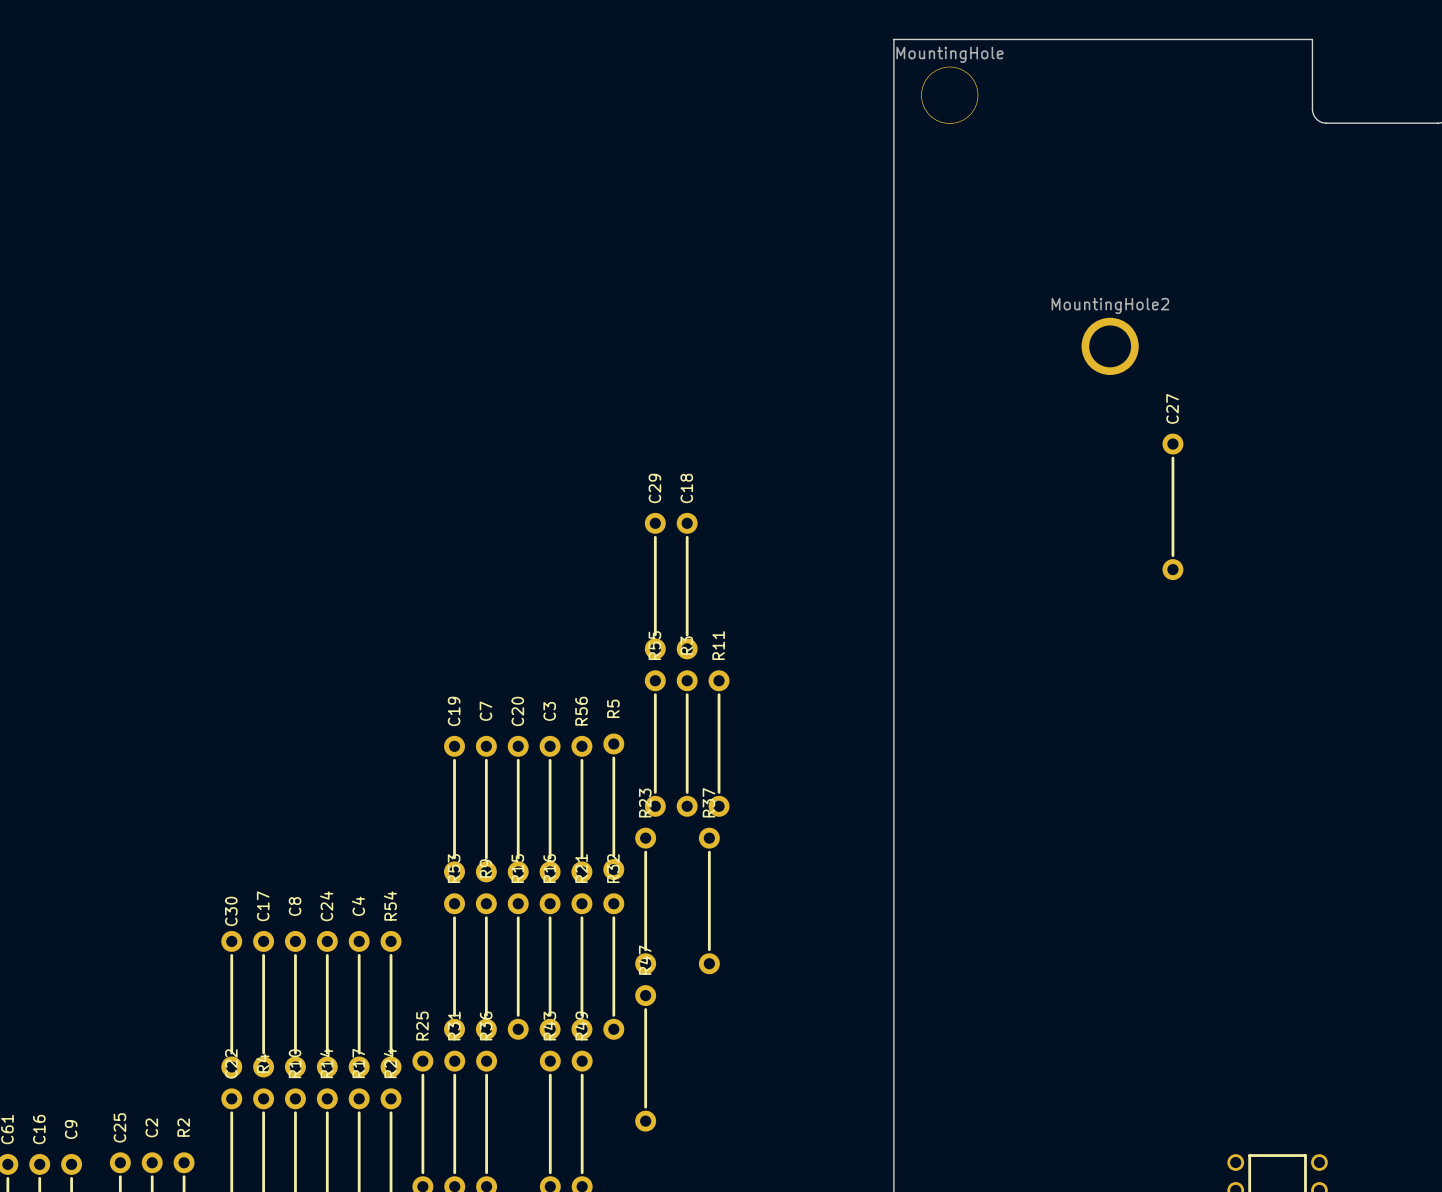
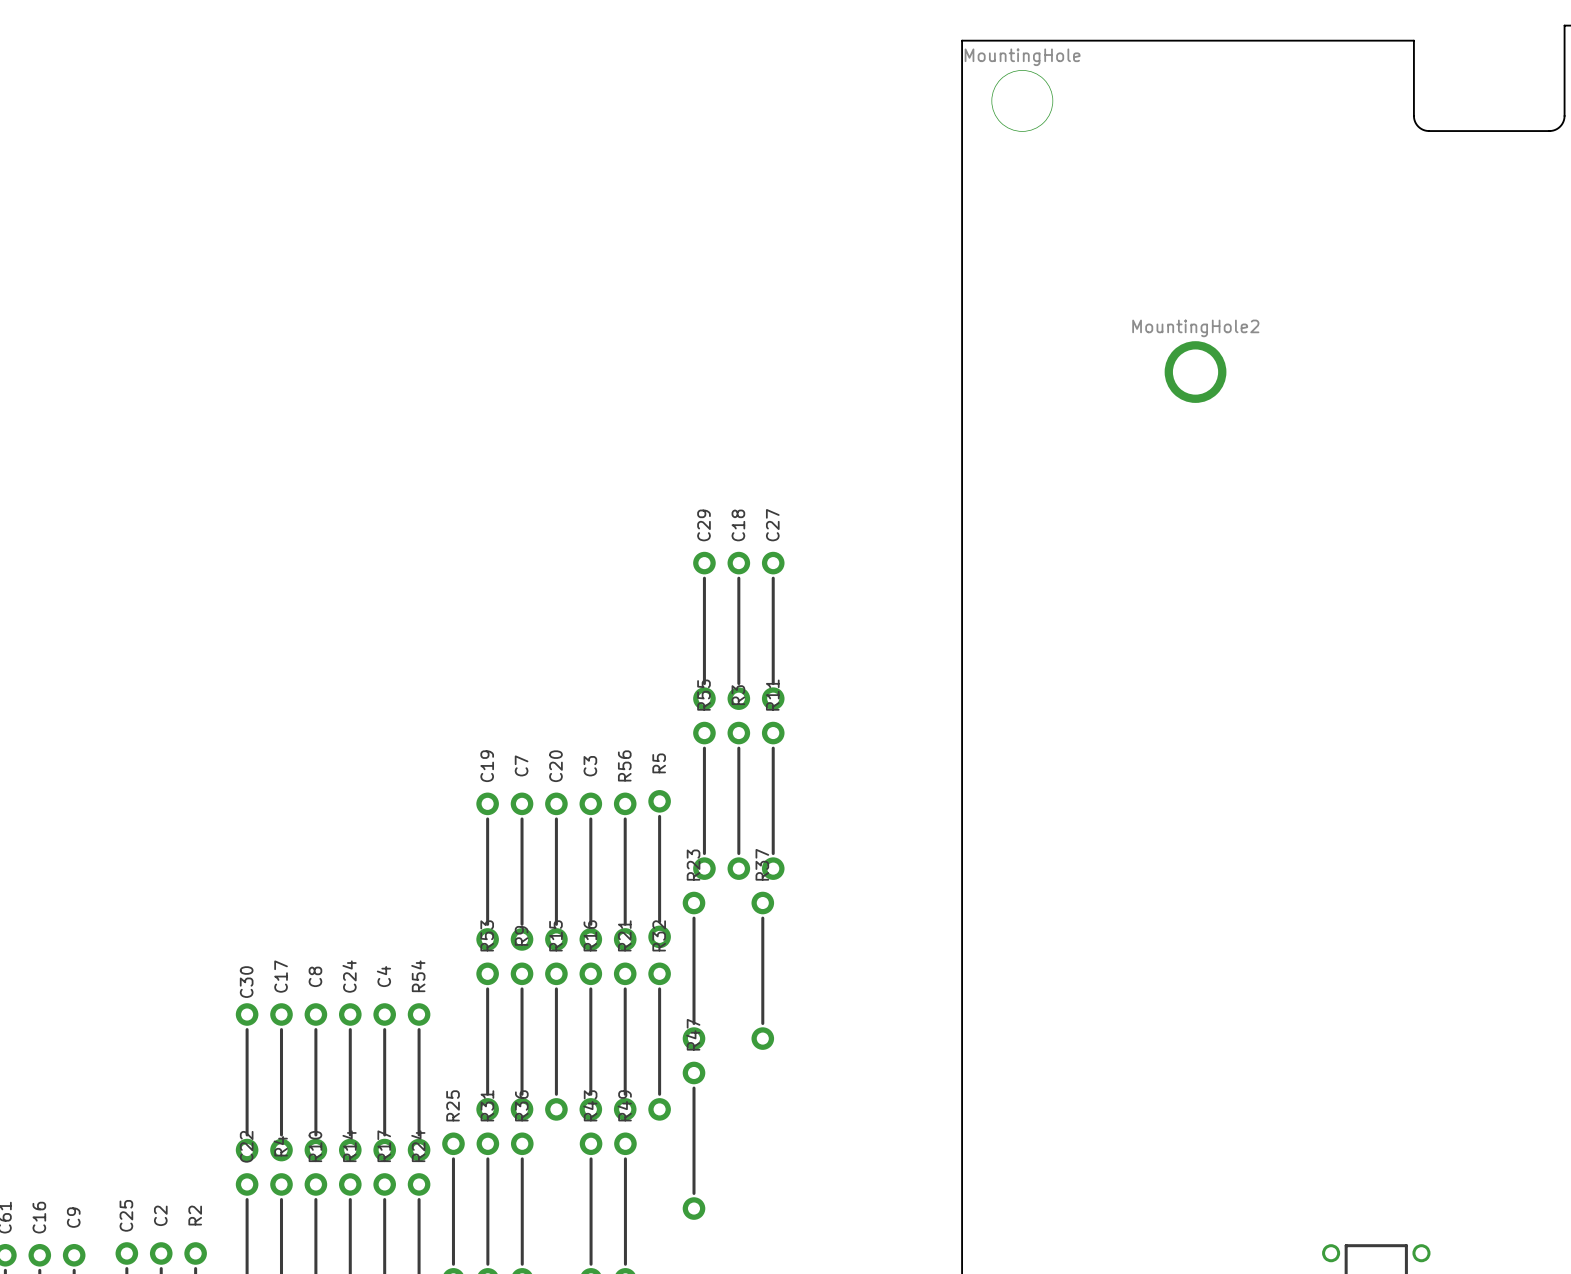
C27 position: (1172, 506) -> (773, 630)

